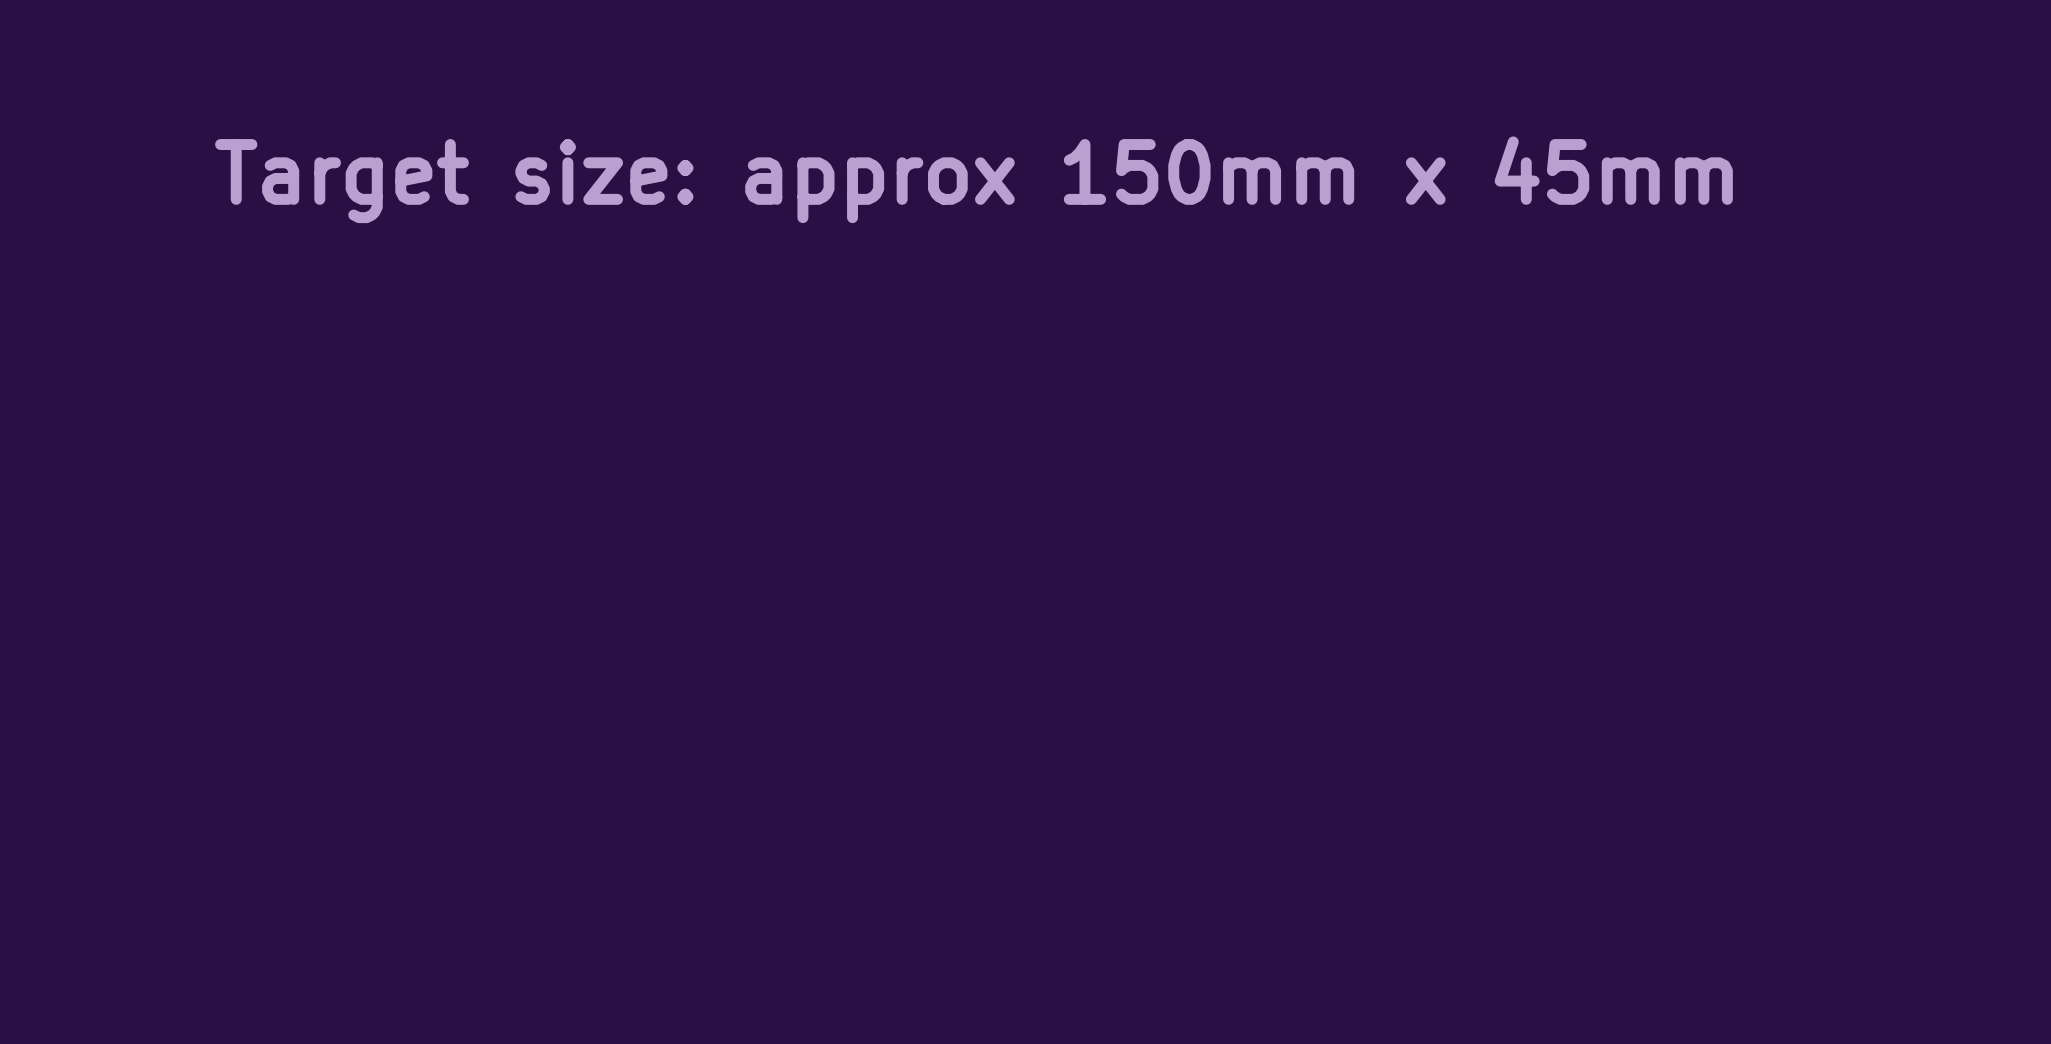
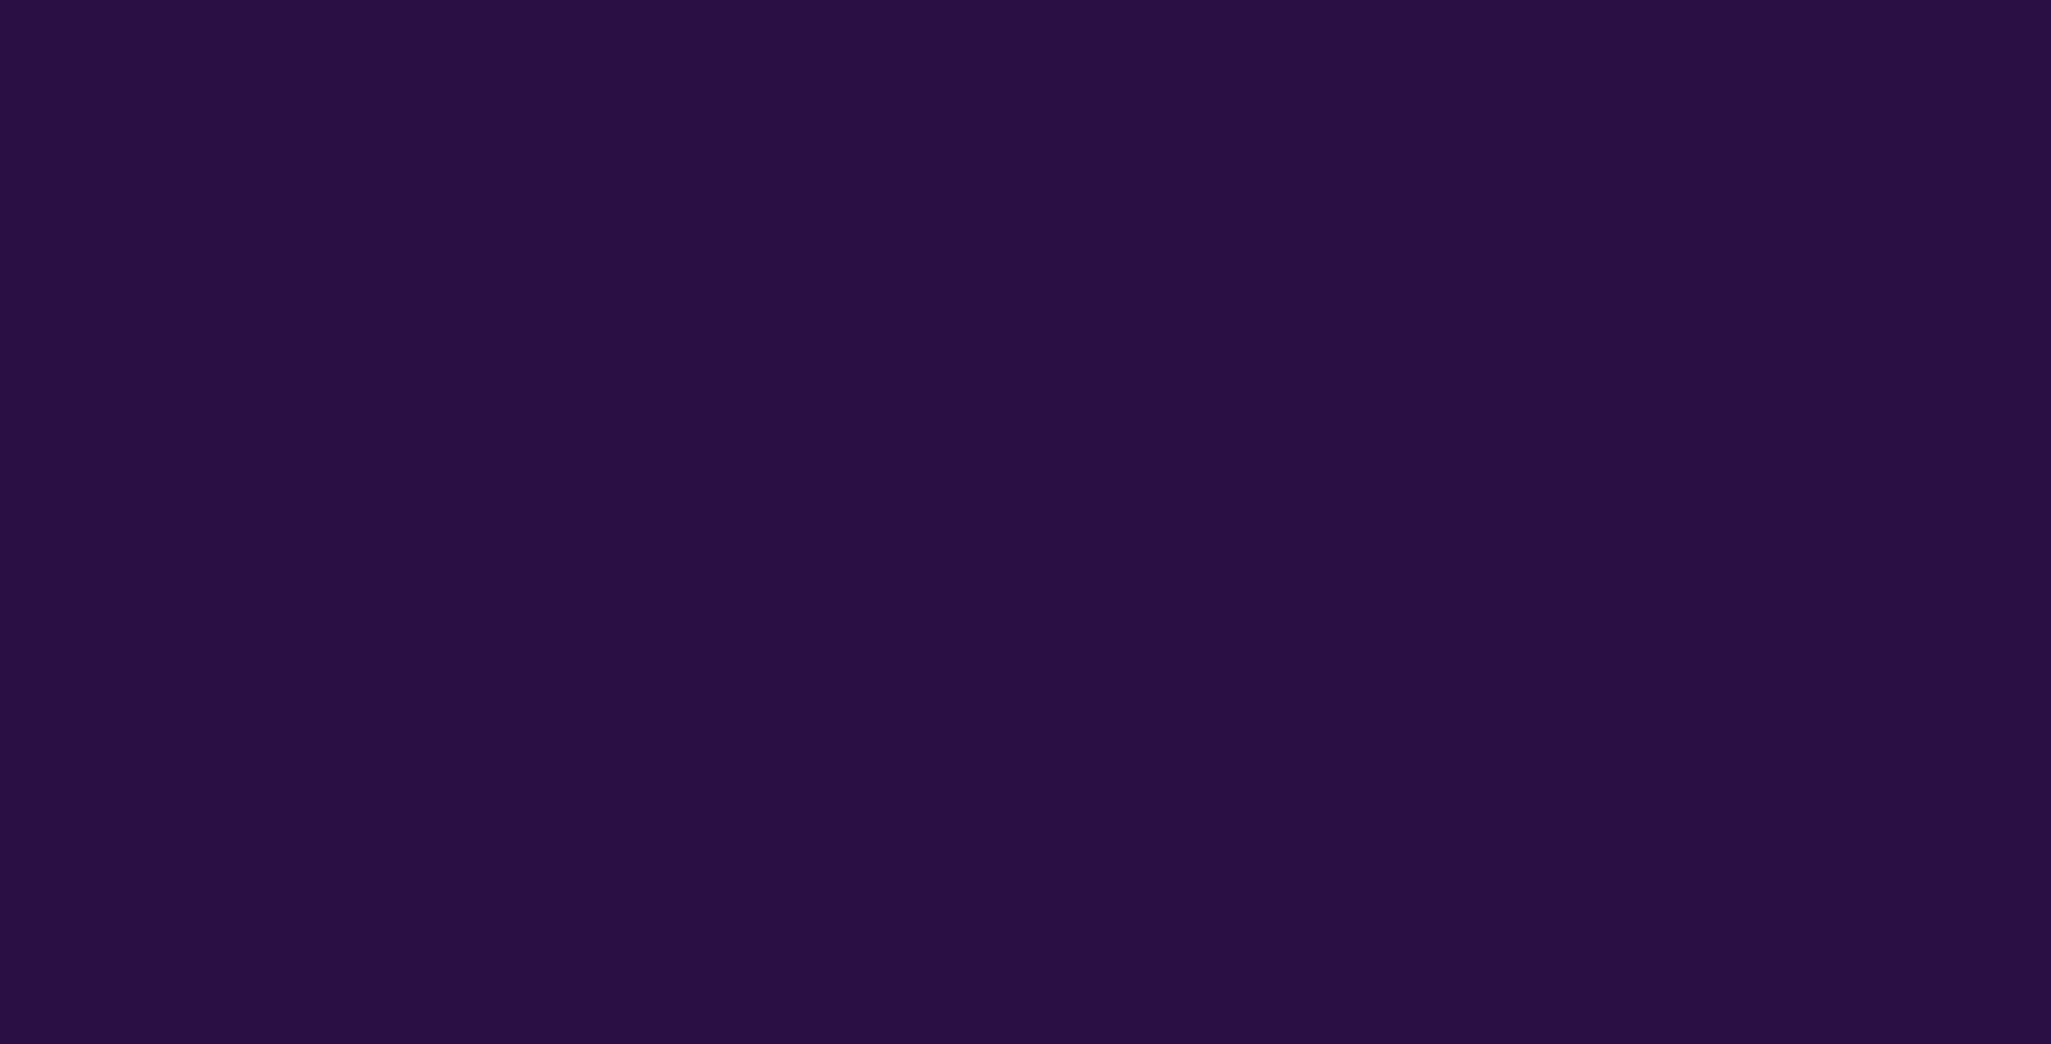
text: Target size: approx 150mm x 45mm (973, 179) -> none

